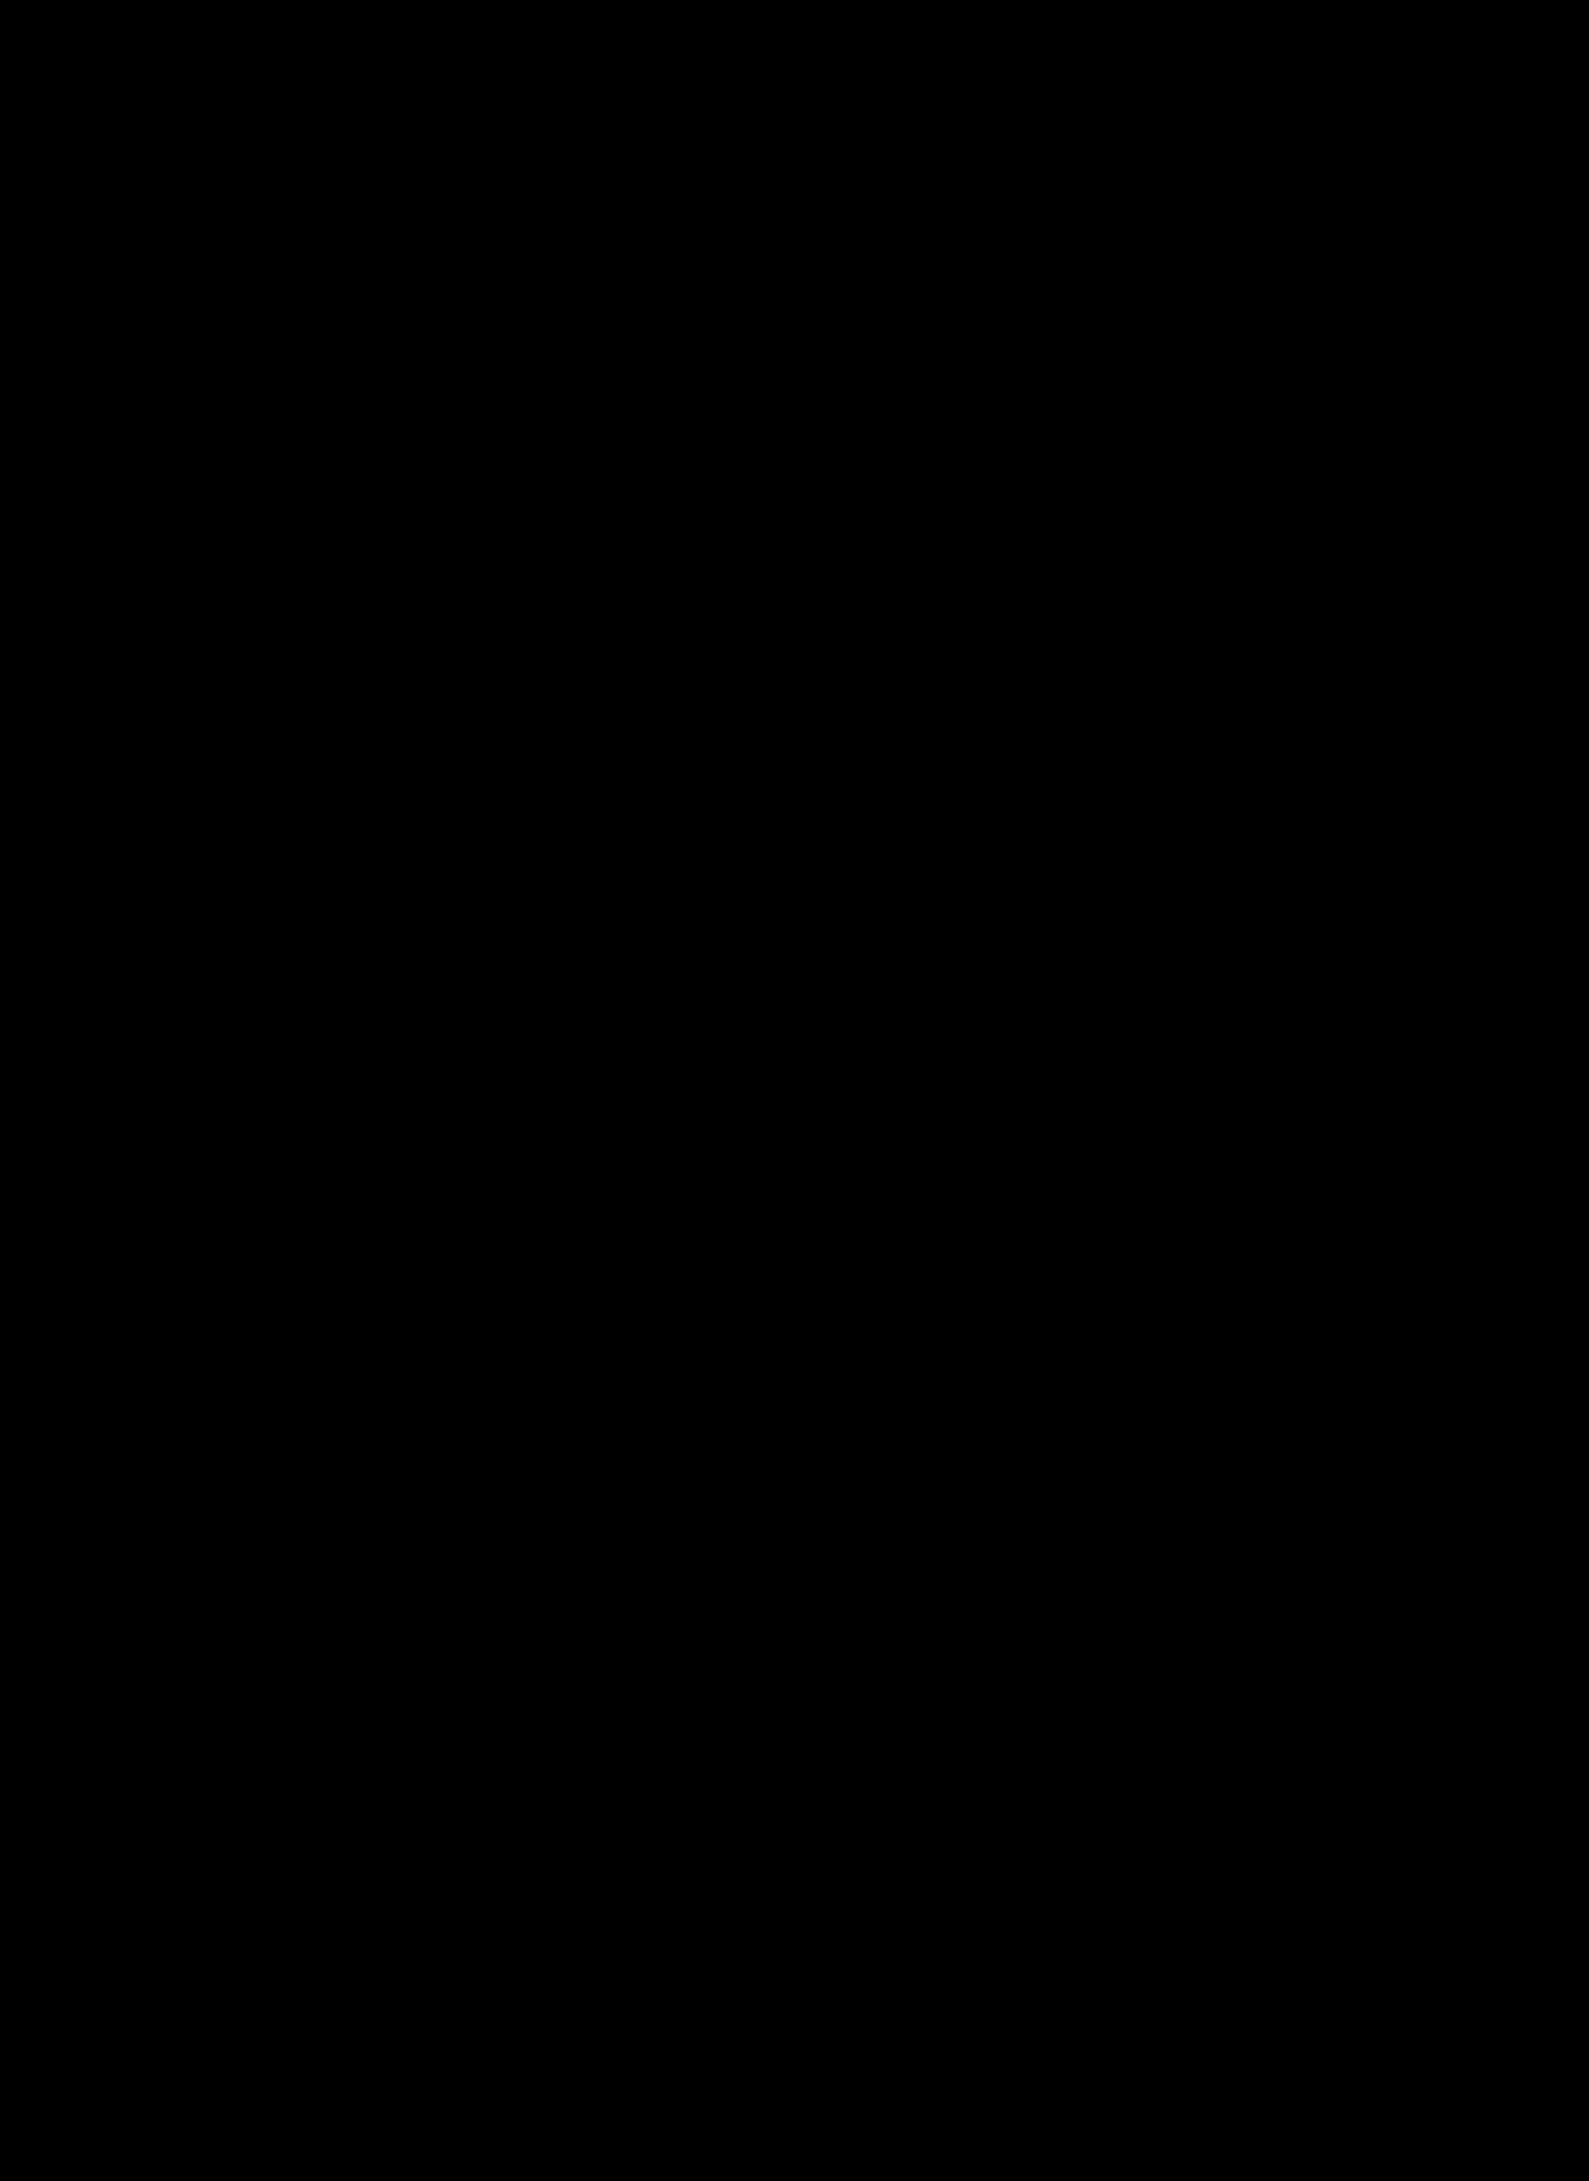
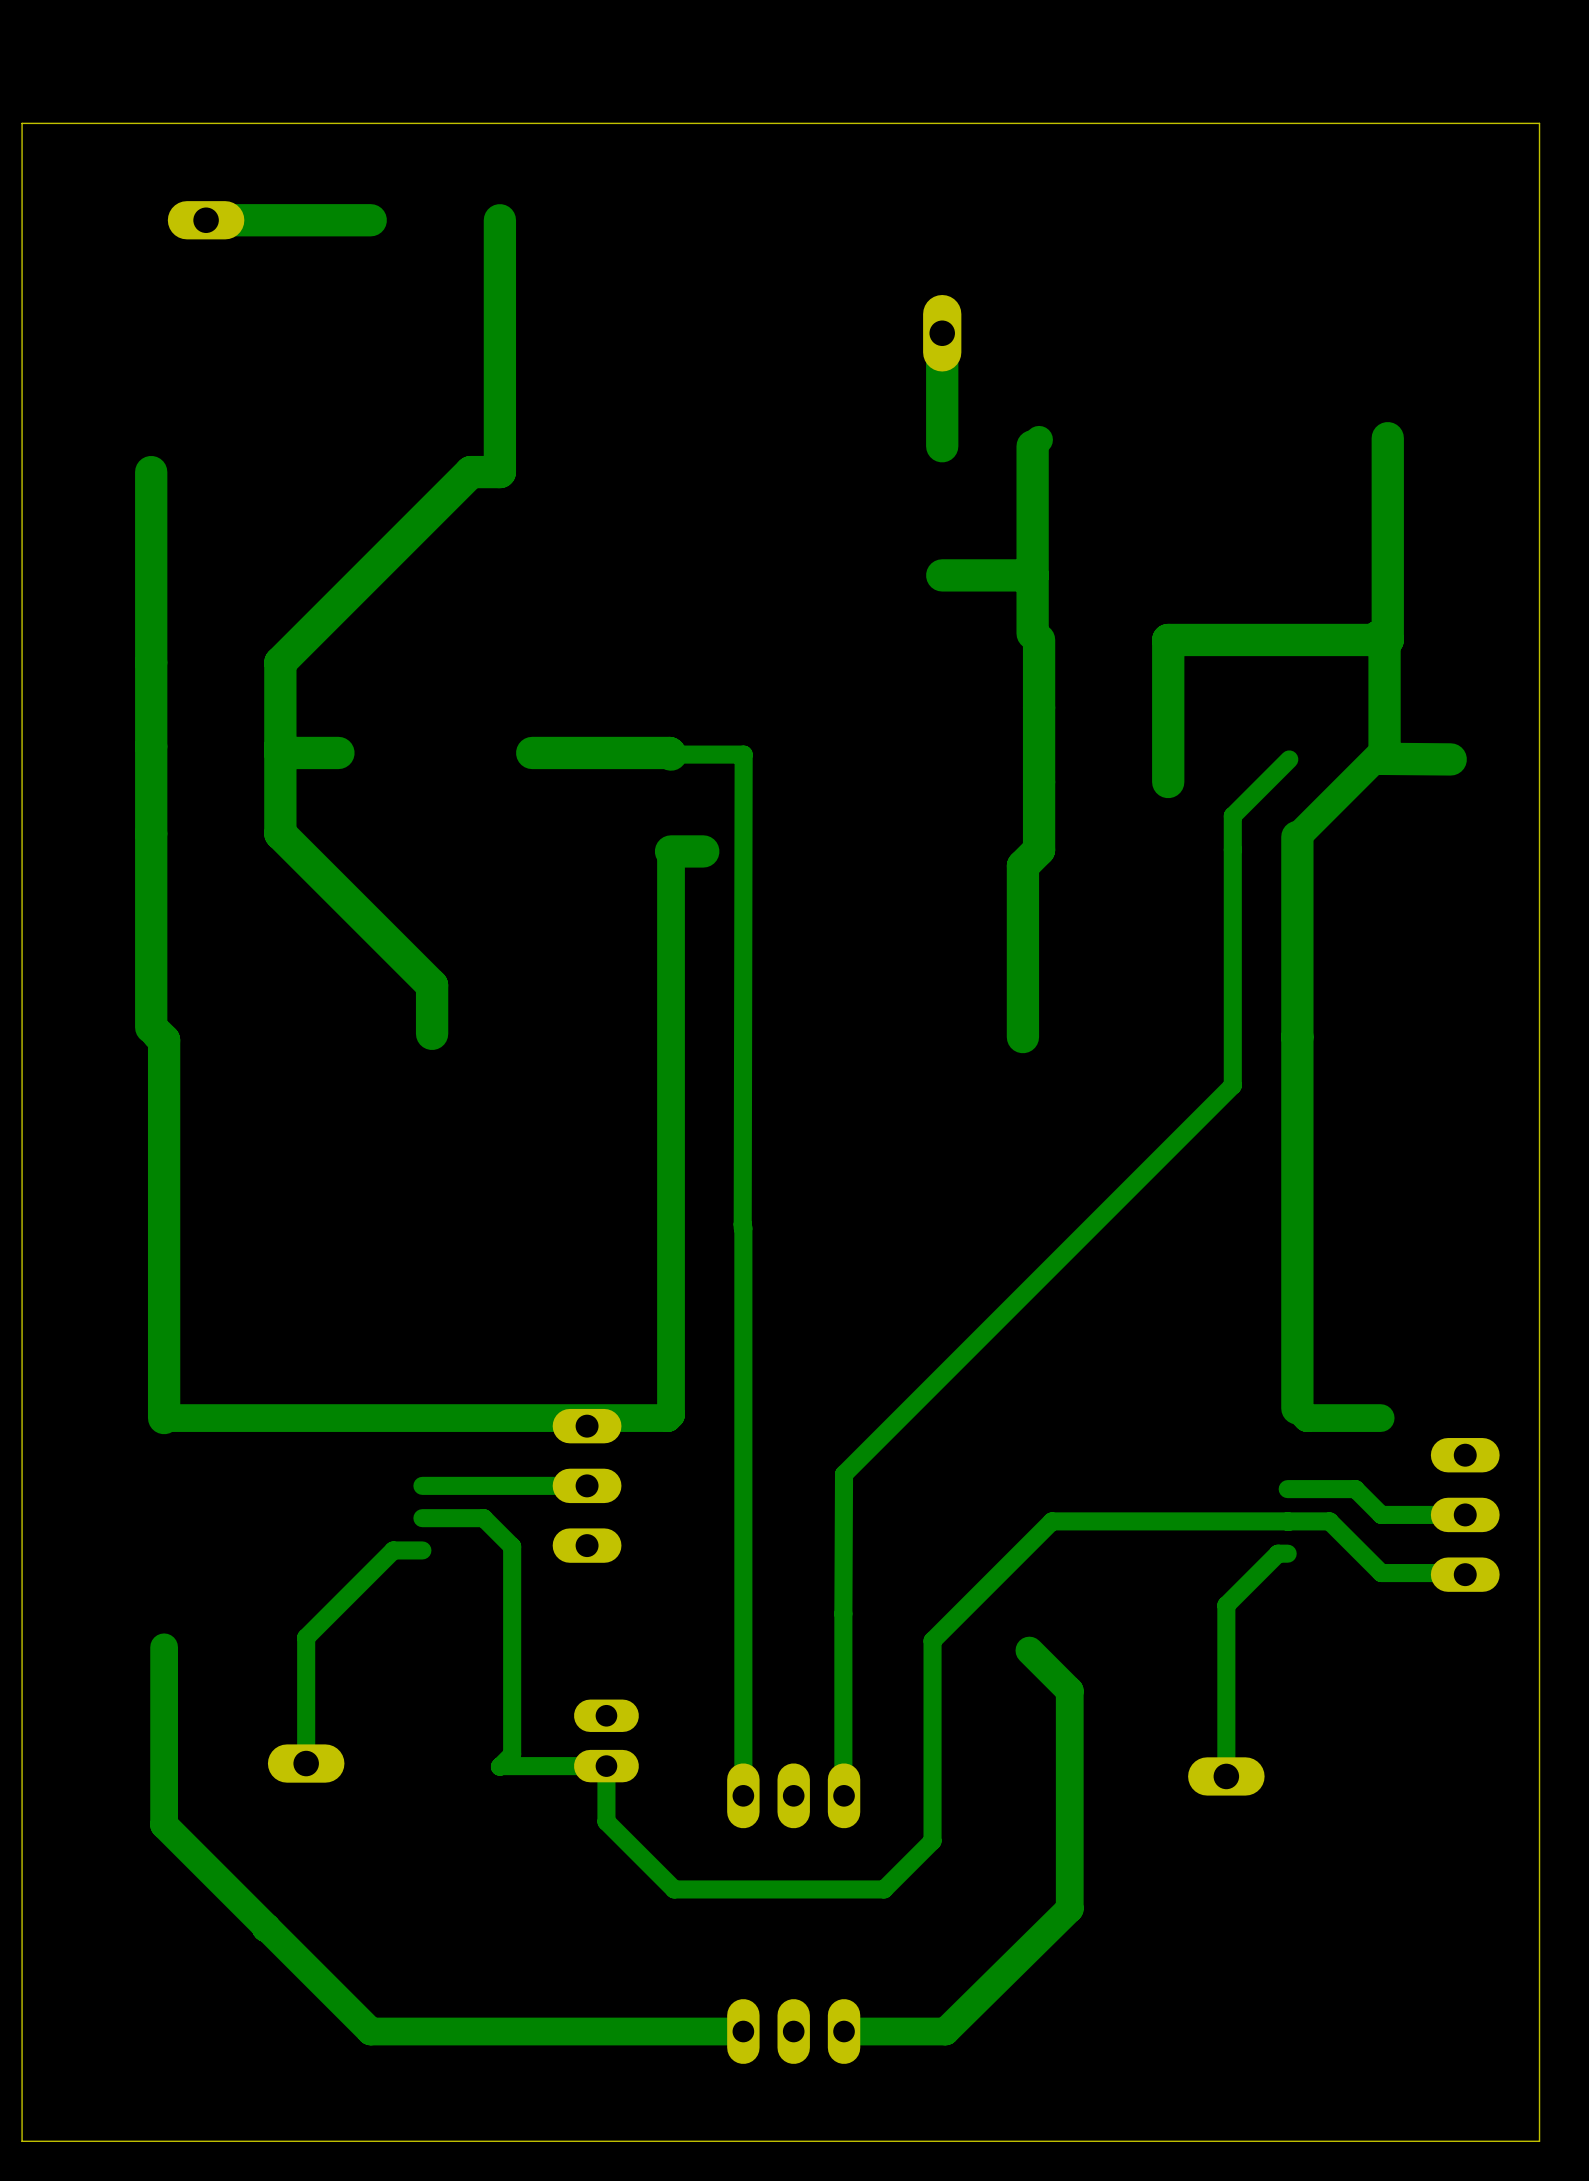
board edge: none -> (1539, 123) (22, 123) (22, 2141) (1539, 2141) (1539, 123)
part: none -> (206, 220)
bottom track: none -> (370, 220) (206, 220)
bottom track: none -> (499, 220) (499, 472) (470, 472) (280, 662) (280, 833) (432, 985) (432, 1033)
bottom track: none -> (942, 317) (942, 446)
part: none -> (942, 333)
bottom track: none -> (1387, 438) (1387, 639) (1168, 639) (1168, 782)
bottom track: none -> (1039, 439) (1032, 446) (1032, 633) (1039, 639) (1039, 849) (1022, 865) (1022, 1037)
bottom track: none -> (151, 472) (151, 1027) (164, 1040) (164, 1418) (667, 1418) (671, 1414) (671, 851) (703, 851)
bottom track: none -> (1032, 575) (942, 575)
bottom track: none -> (1381, 639) (1378, 636) (1384, 639) (1384, 752) (1381, 758) (1450, 759)
bottom track: none -> (1384, 749) (1297, 836) (1297, 1408) (1307, 1418) (1380, 1418)
bottom track: none -> (338, 752) (280, 752)
bottom track: none -> (532, 752) (743, 754) (742, 1228)
bottom track: none -> (1289, 759) (1232, 815) (1232, 1085) (844, 1474) (844, 1795)
bottom track: none -> (742, 1224) (743, 1795)
bottom track: none -> (587, 1485) (422, 1485)
part: none -> (587, 1485)
bottom track: none -> (1287, 1489) (1355, 1489) (1381, 1514) (1465, 1514)
part: none -> (1465, 1514)
bottom track: none -> (422, 1518) (483, 1518) (512, 1546) (512, 1754) (499, 1766)
bottom track: none -> (422, 1550) (393, 1550) (306, 1637) (306, 1763)
bottom track: none -> (1287, 1553) (1278, 1553) (1226, 1605) (1226, 1776)
bottom track: none -> (1465, 1574) (1463, 1573) (1381, 1573) (1329, 1521) (1051, 1521) (932, 1640) (932, 1841) (884, 1889) (674, 1889) (606, 1821) (606, 1766) (500, 1766)
bottom track: none -> (164, 1647) (164, 1824) (370, 2031) (743, 2031)
bottom track: none -> (1029, 1650) (1069, 1690) (1069, 1908) (945, 2031) (844, 2031)
part: none -> (606, 1740)
part: none -> (306, 1763)
part: none -> (1226, 1776)
part: none -> (793, 1795)
part: none -> (793, 2031)

